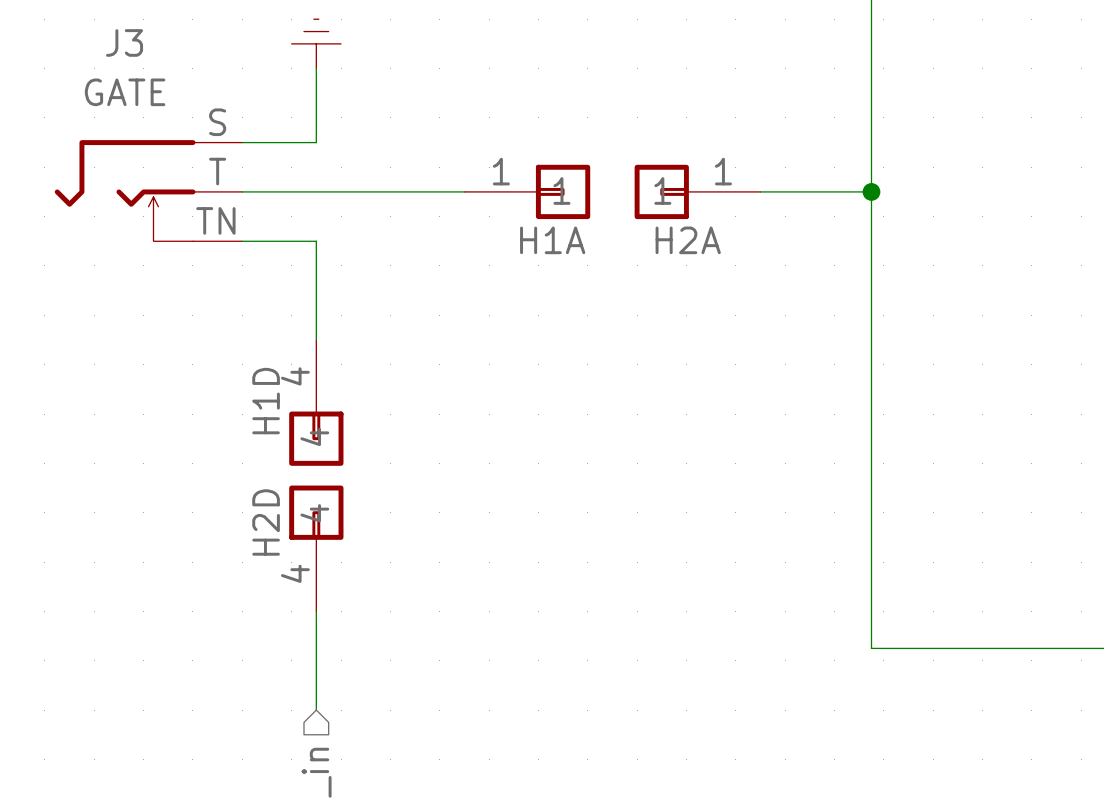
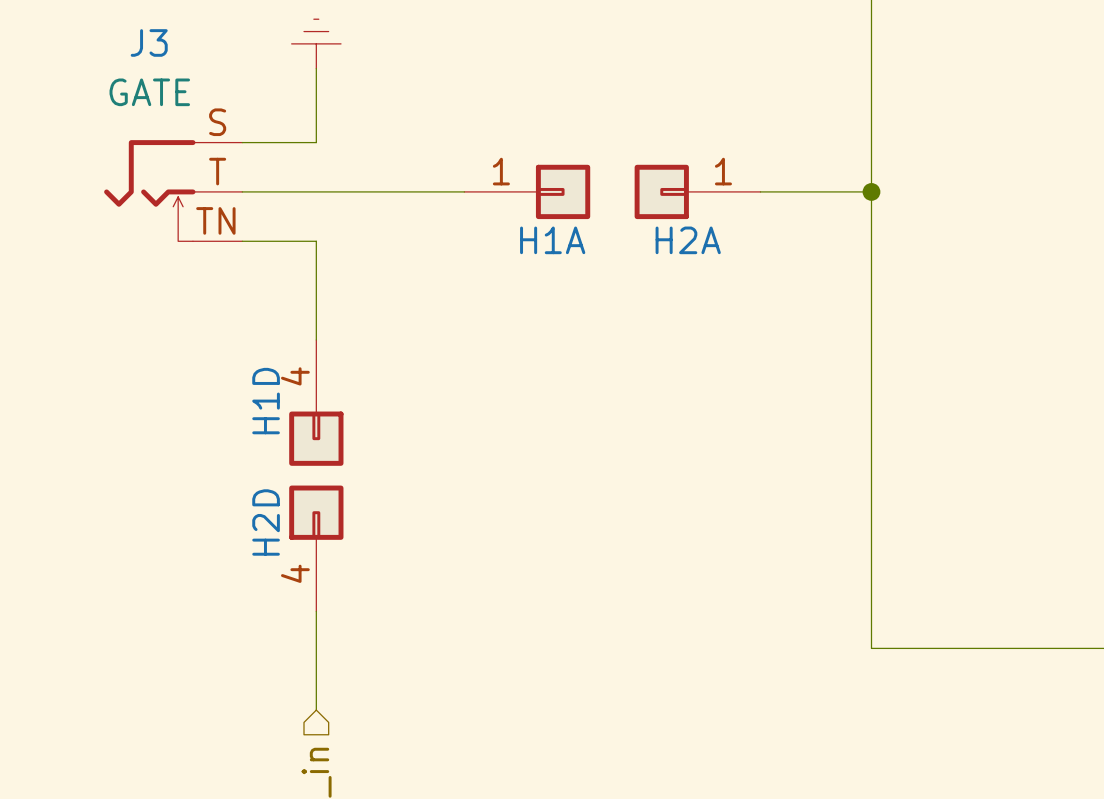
J3 symbol: [54, 140, 243, 242] -> [104, 140, 243, 242]
H1A pin name: 1 (561, 191) -> none
H2A pin name: 1 (662, 191) -> none
H1D pin name: 4 (314, 436) -> none
H2D pin name: 4 (314, 513) -> none

